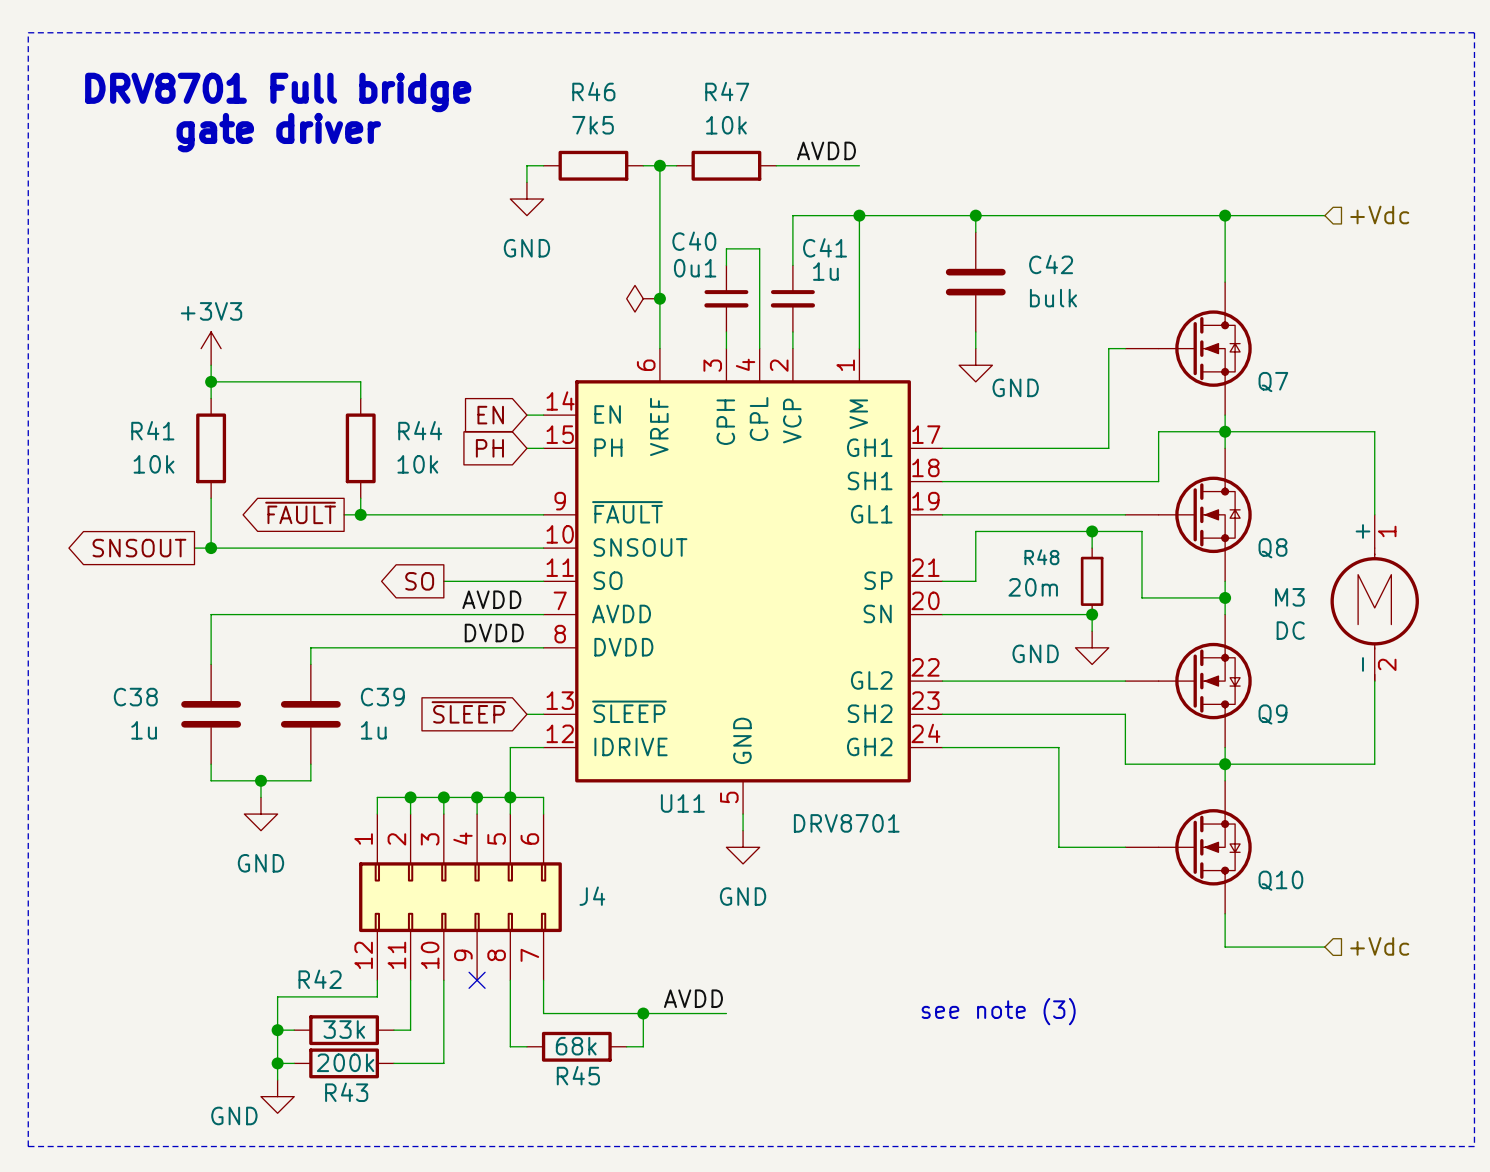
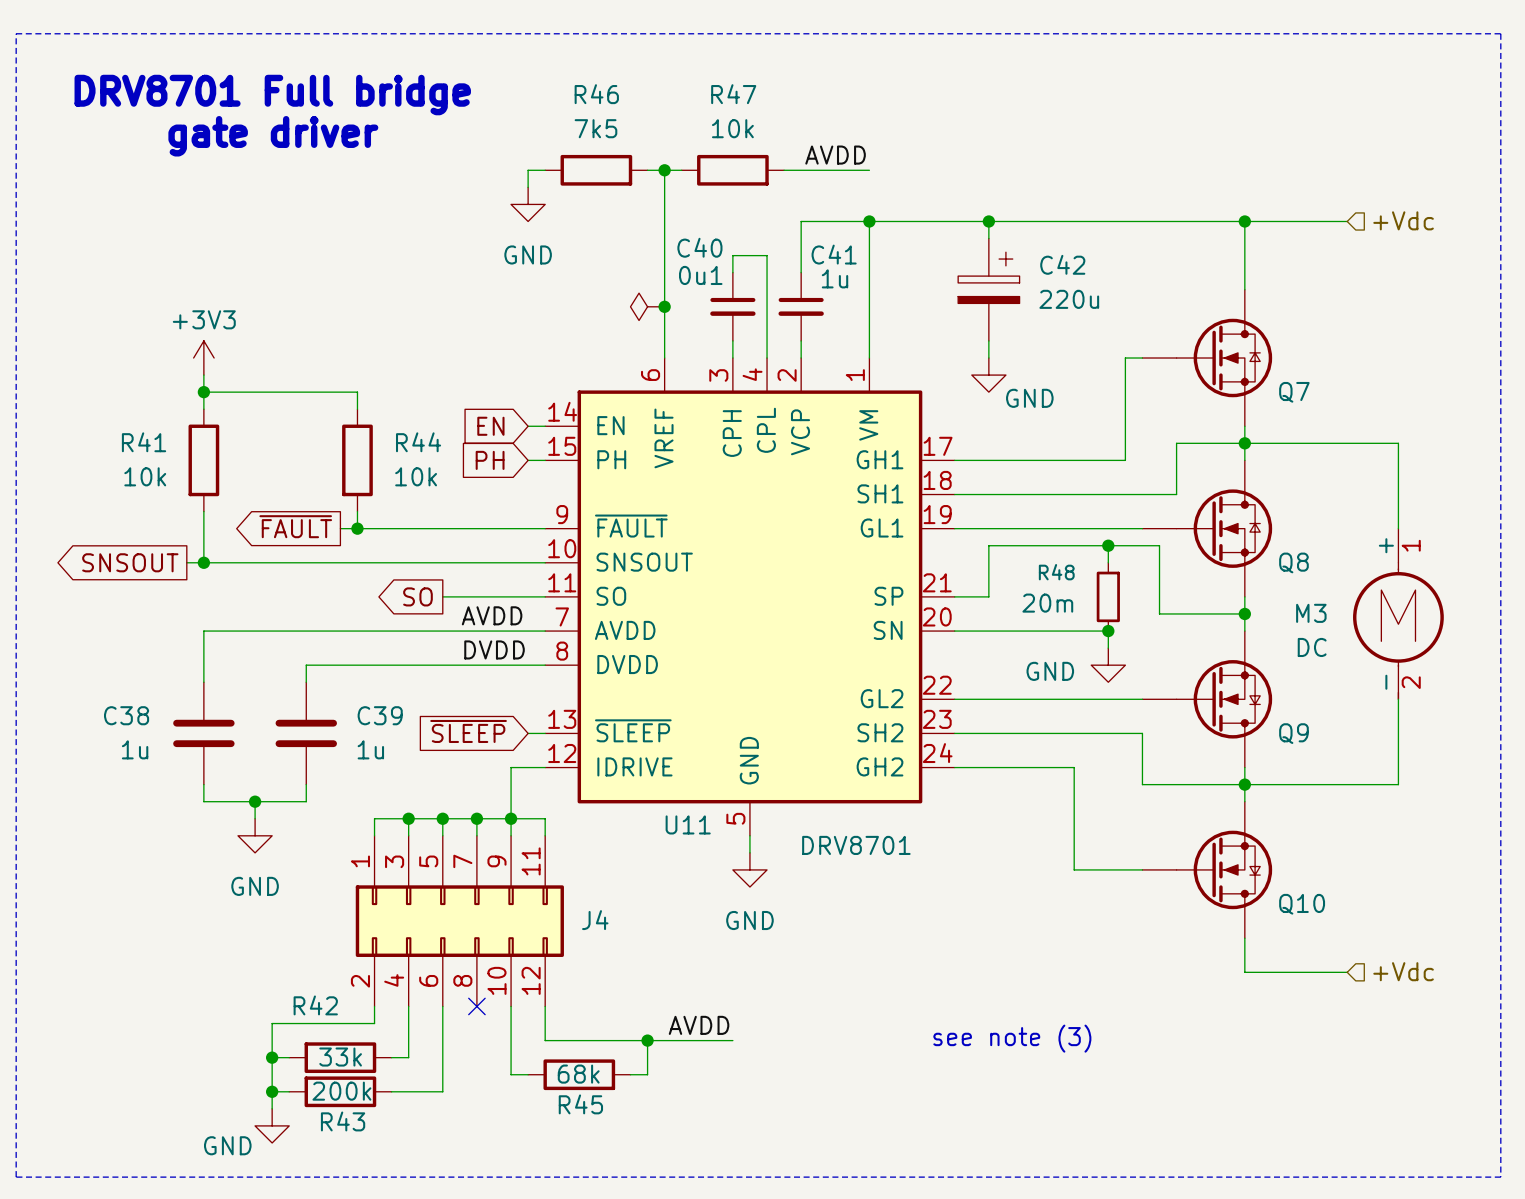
C42 symbol: [945, 232, 1006, 332] -> [958, 238, 1020, 341]
C42 value: bulk (1053, 298) -> 220u (1069, 299)
J4 symbol: [359, 814, 562, 981] -> [355, 835, 564, 1007]

